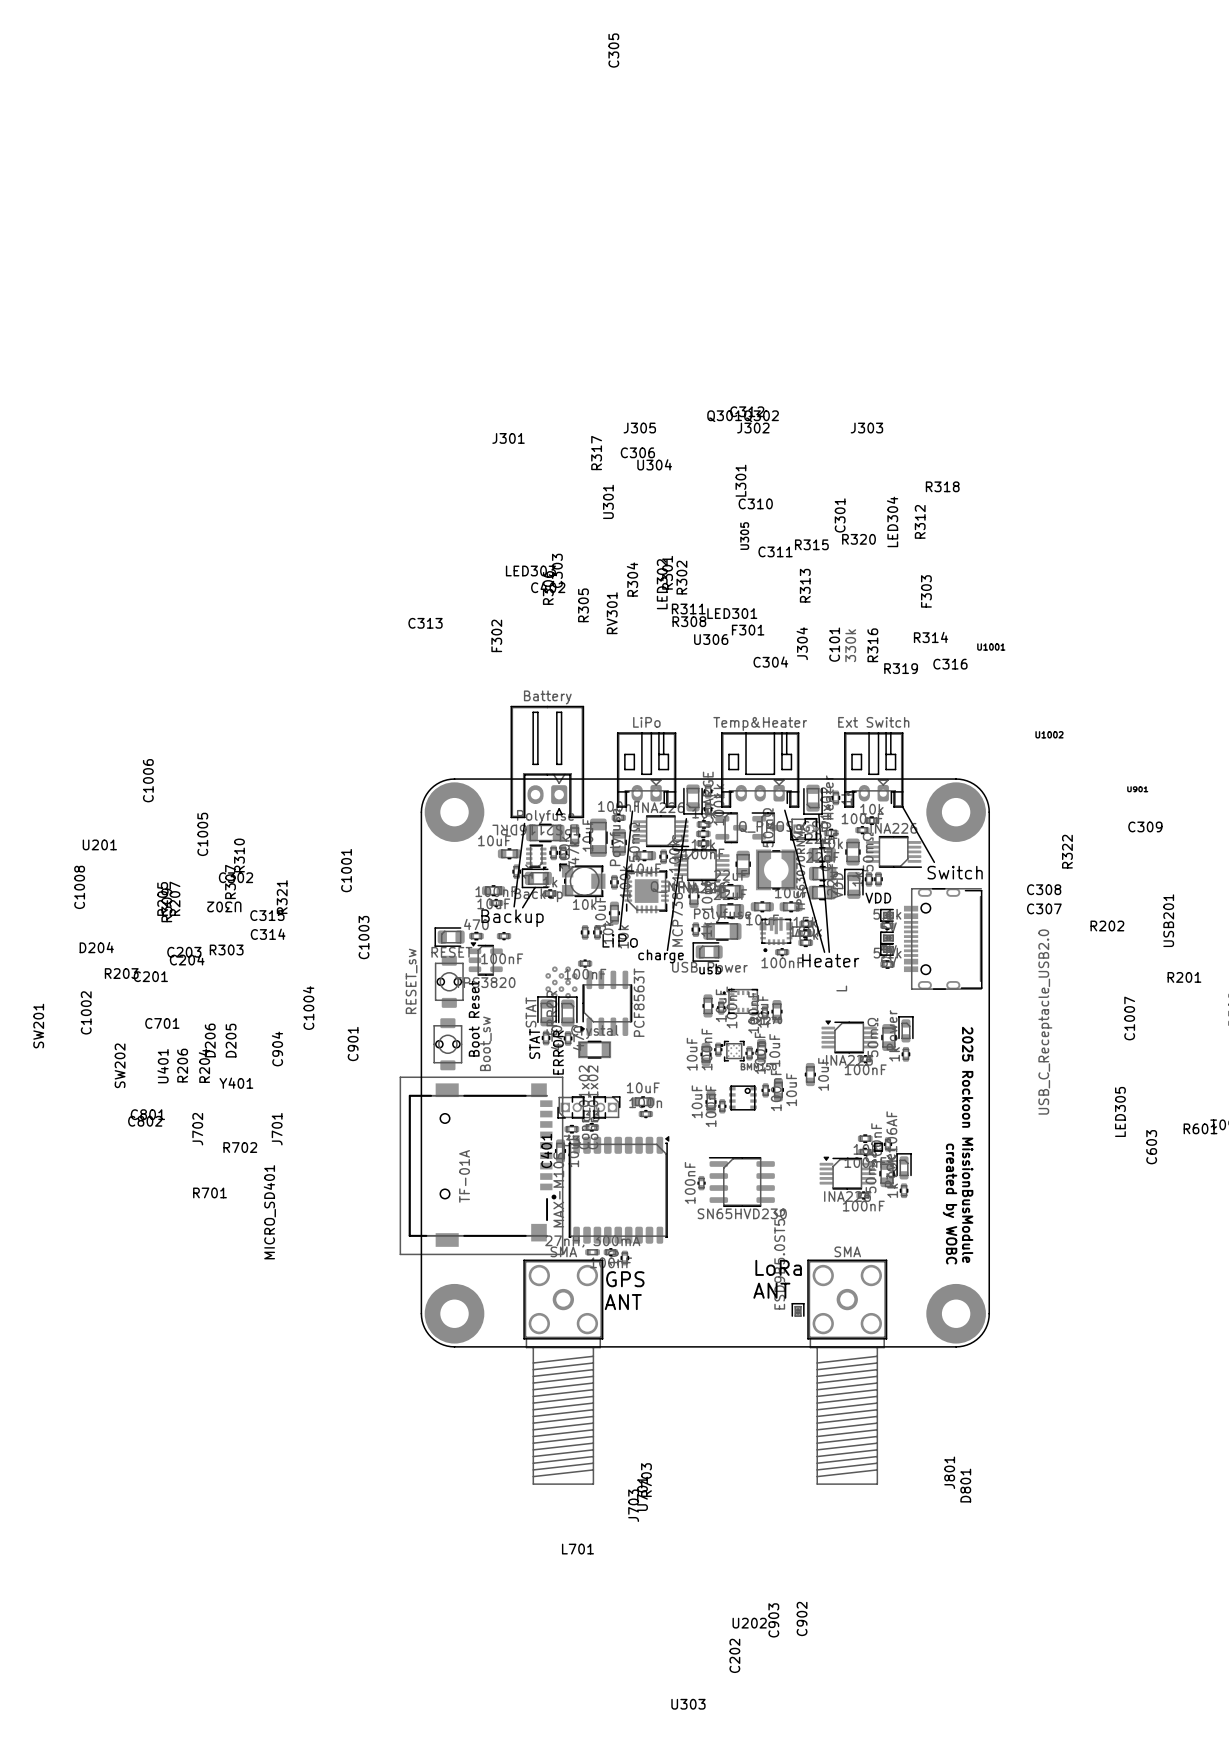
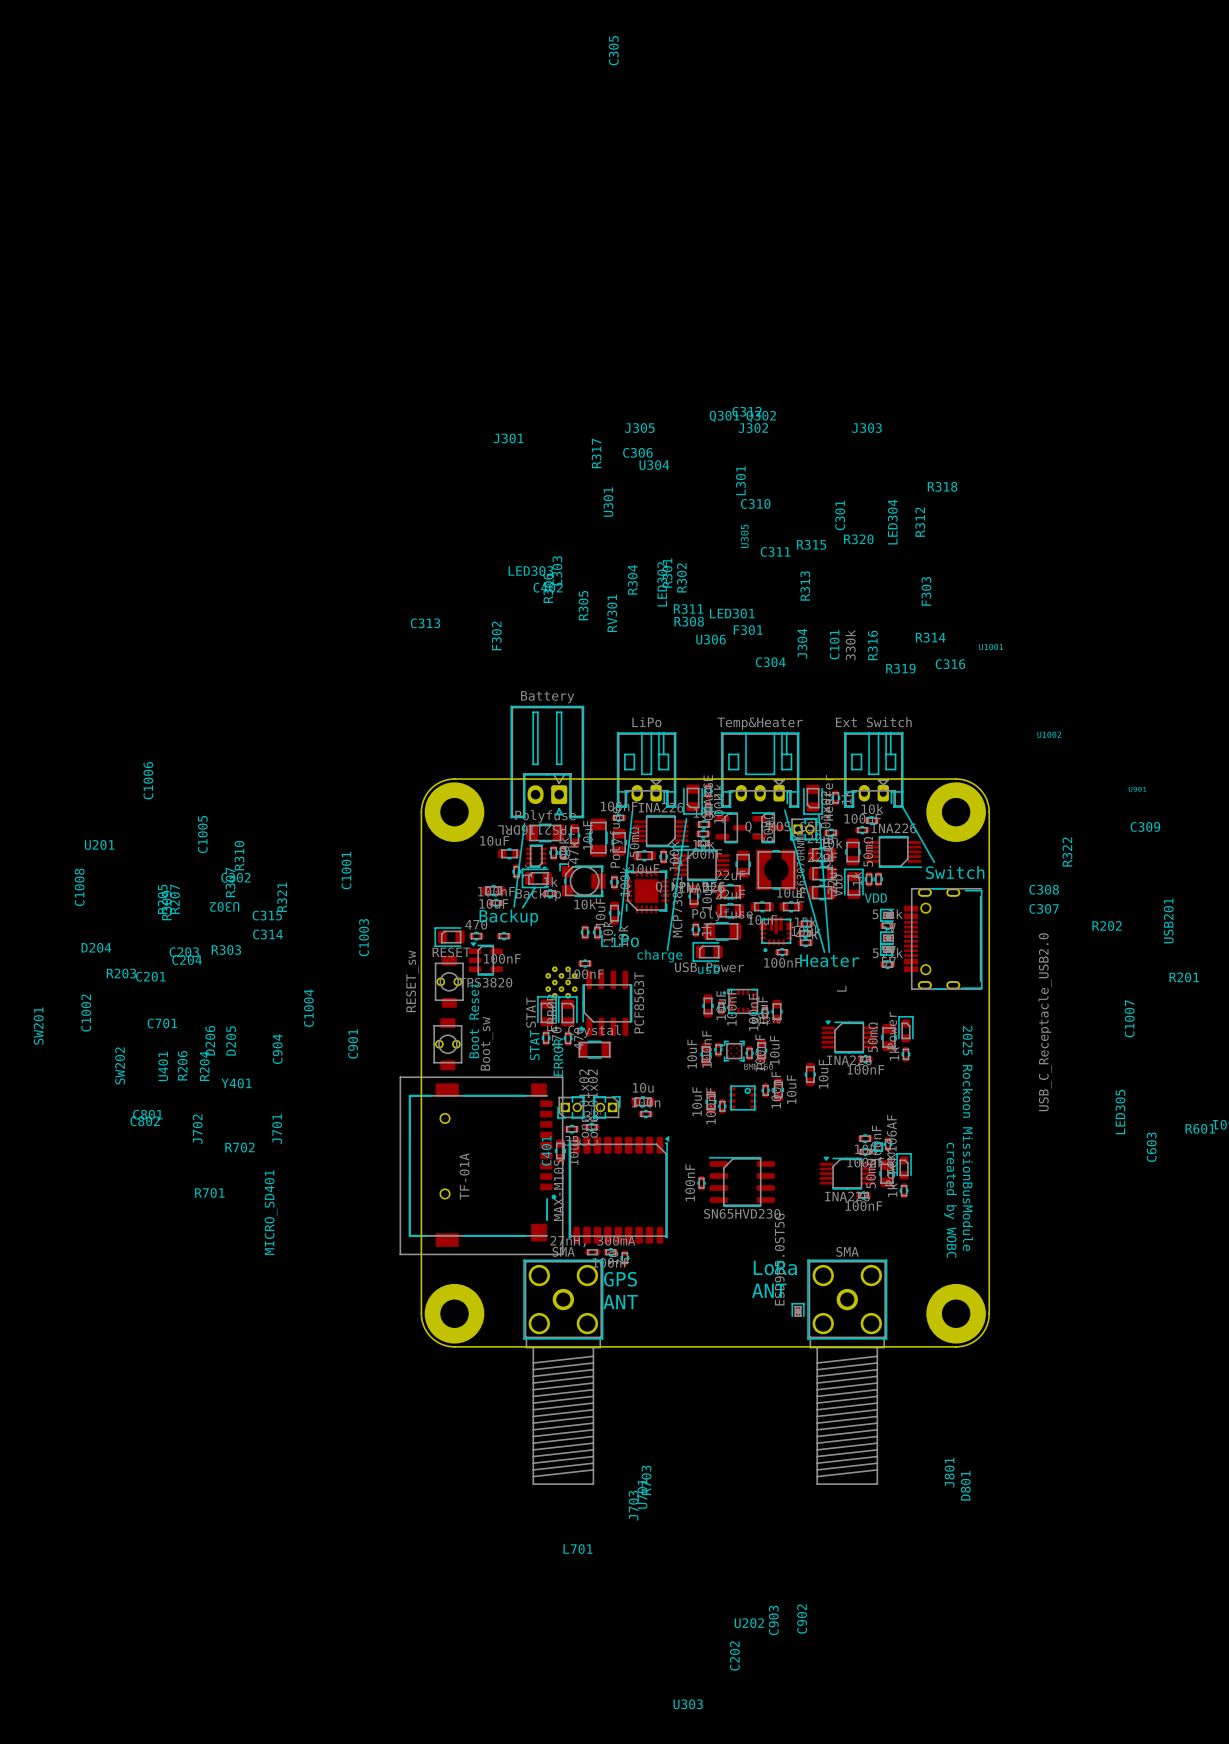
C801 value: 10uF (643, 1087) -> 10u (643, 1087)

